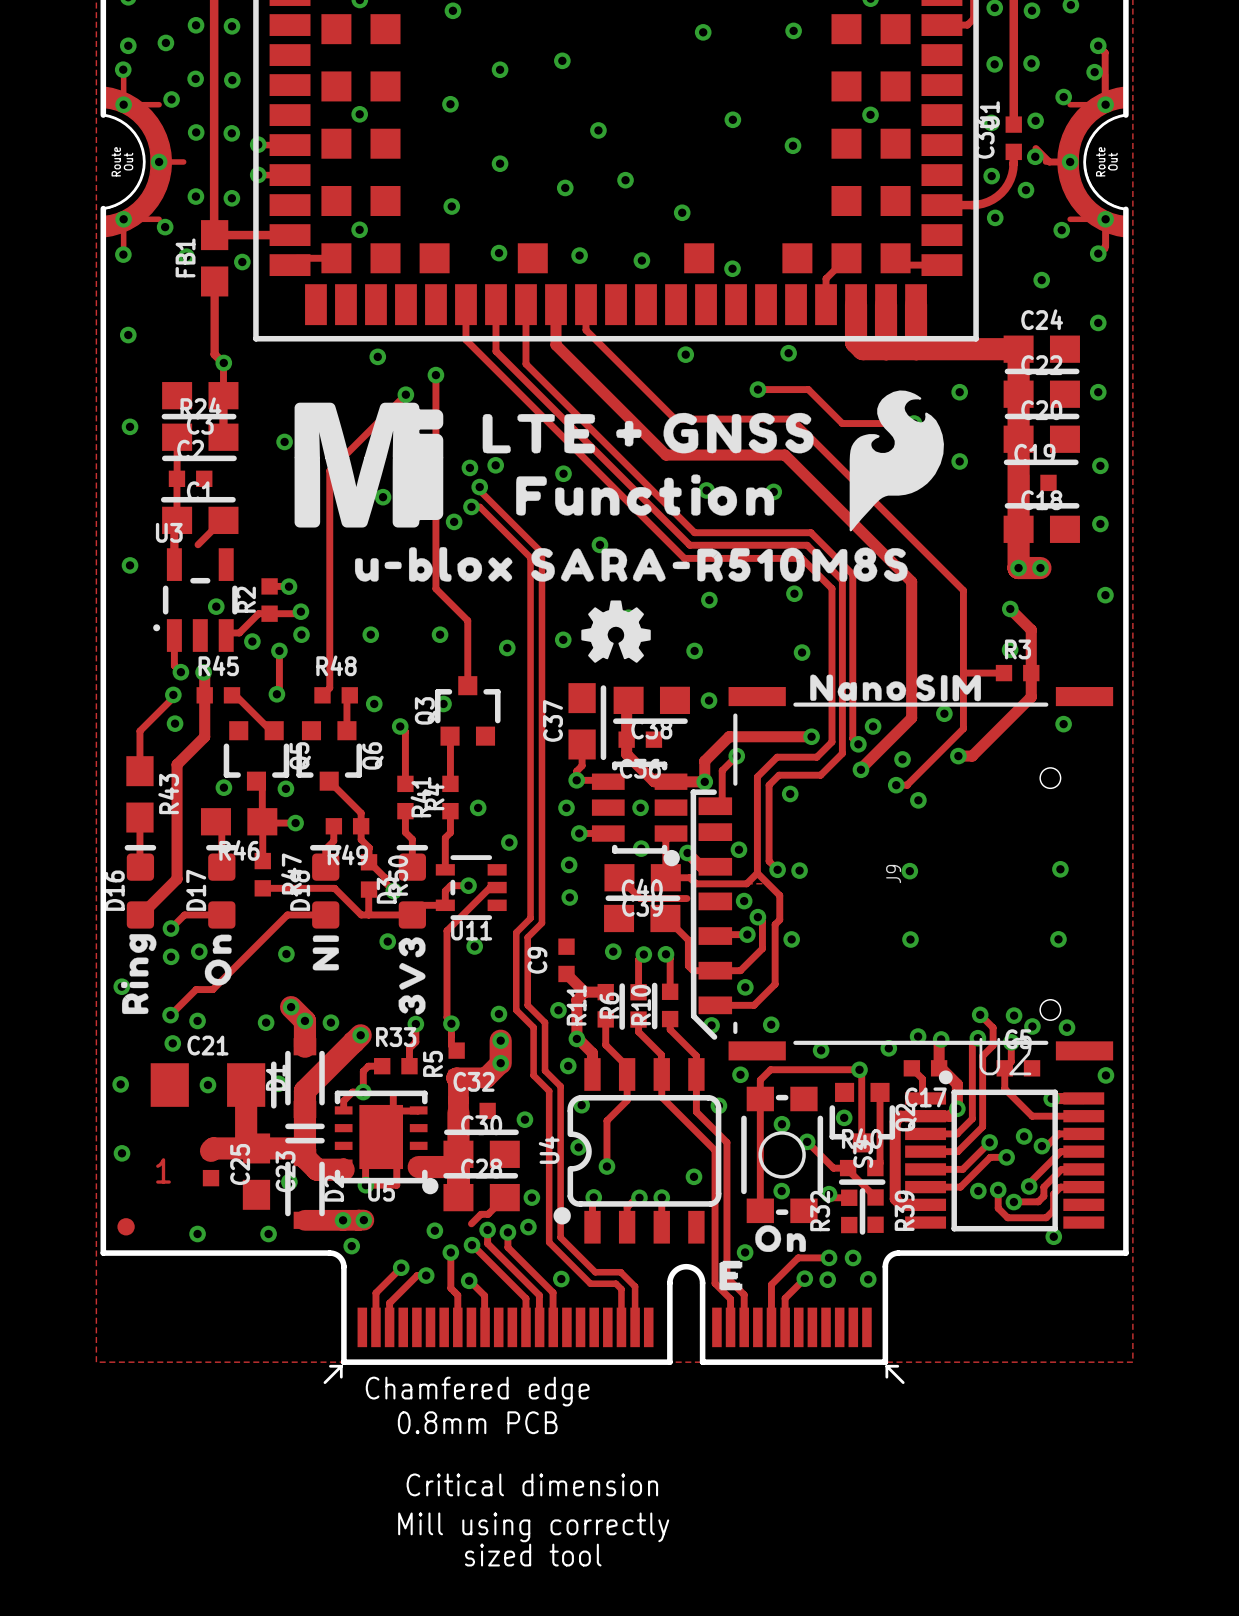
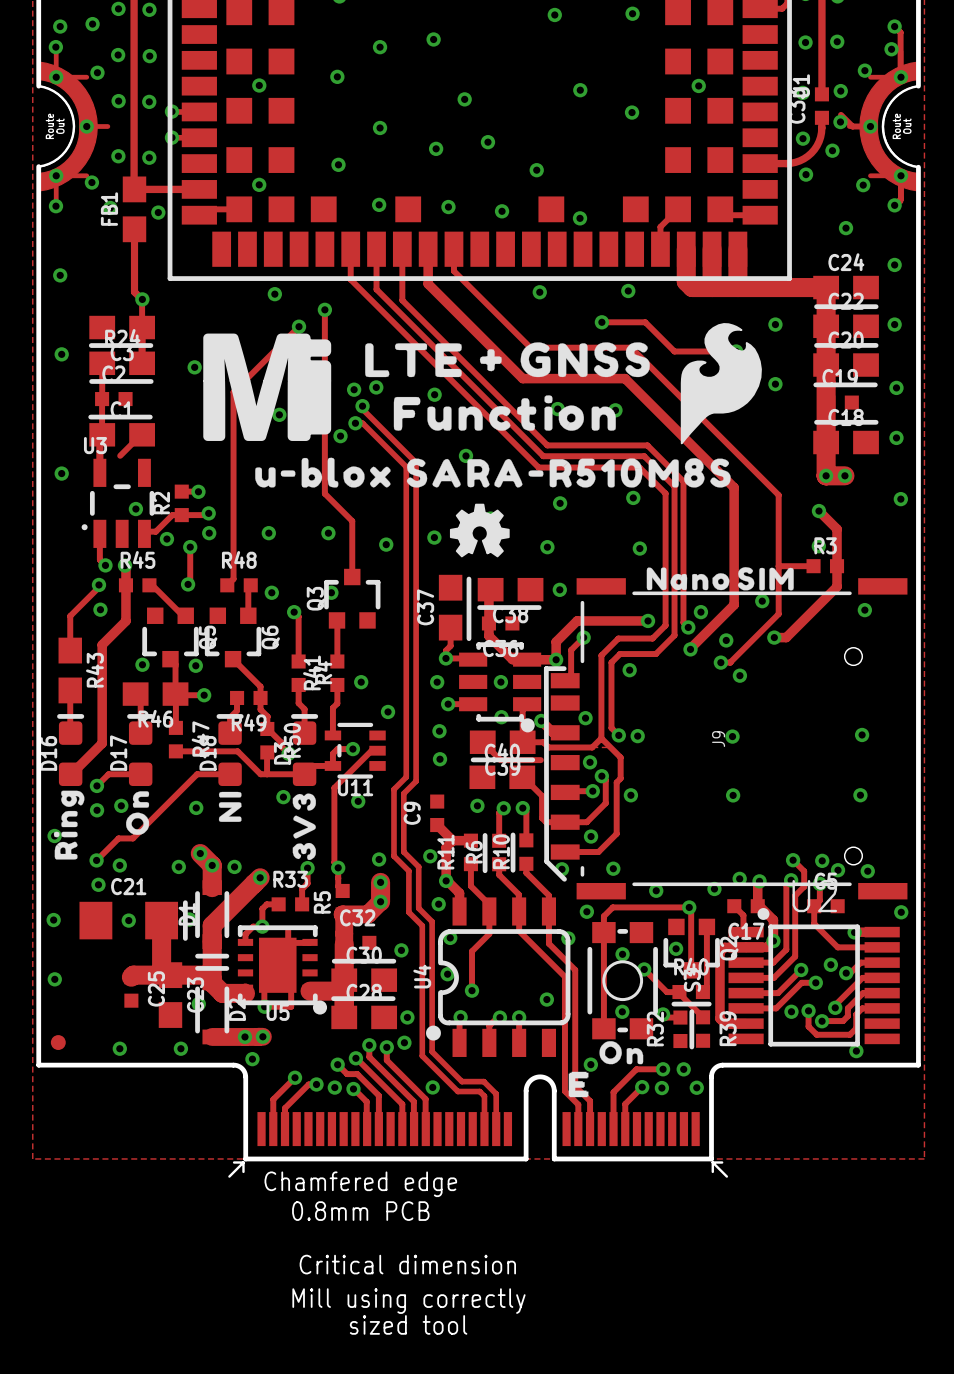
text: 1 (163, 1170) -> none
track: (504, 1197) (488, 1214) (480, 1214) (471, 1223) -> none
via position: (434, 1230) -> (334, 1087)
track: (450, 1252) (450, 1288) (457, 1295) (457, 1327) -> (337, 1064) (347, 1074) (357, 1074) (378, 1095) (378, 1129)

